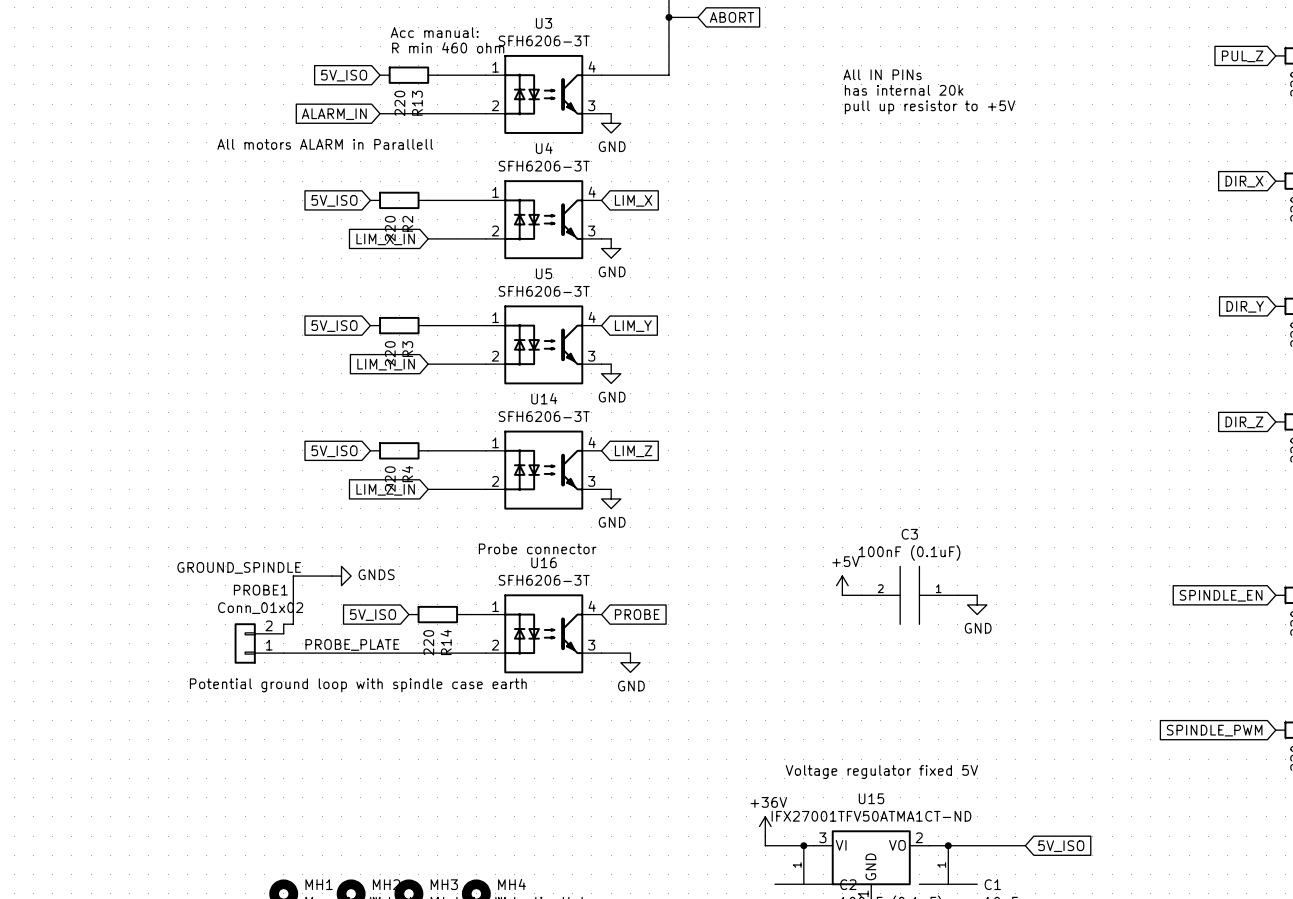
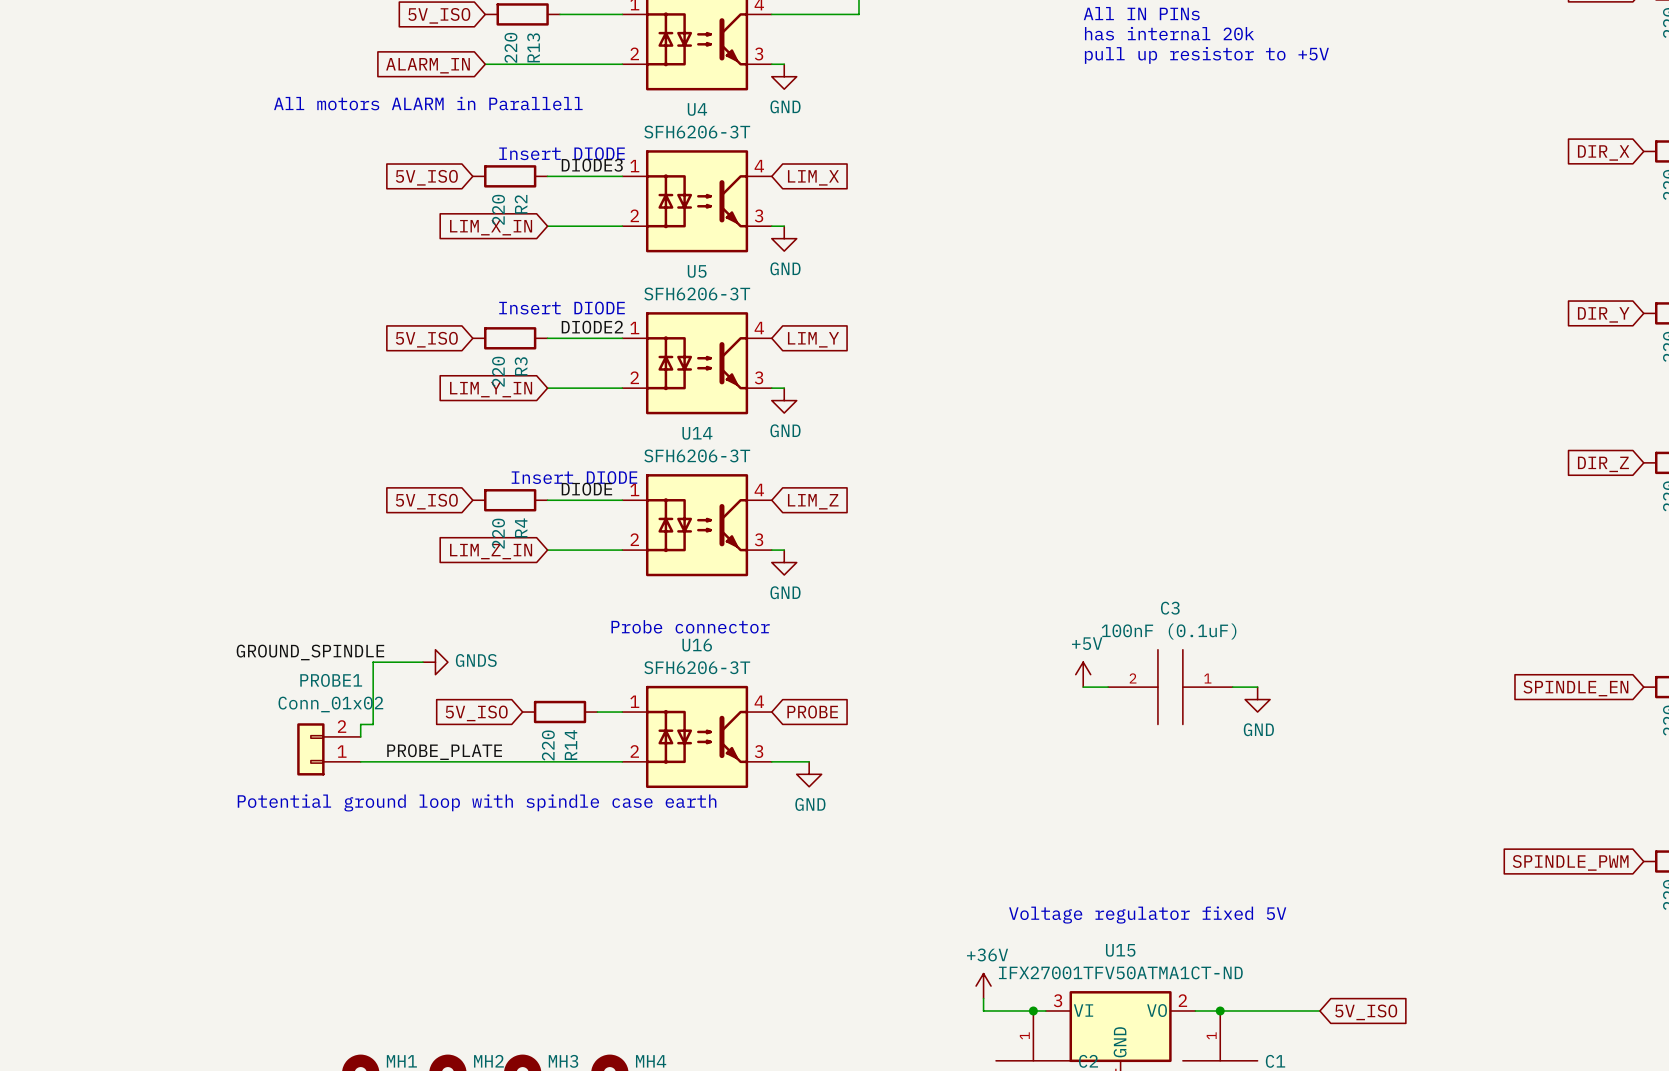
text: none -> Insert DIODE (562, 153)
label: none -> DIODE3 (592, 165)
text: none -> Insert DIODE (562, 308)
label: none -> DIODE2 (592, 327)
text: none -> Insert DIODE (574, 477)
label: none -> DIODE (586, 489)

